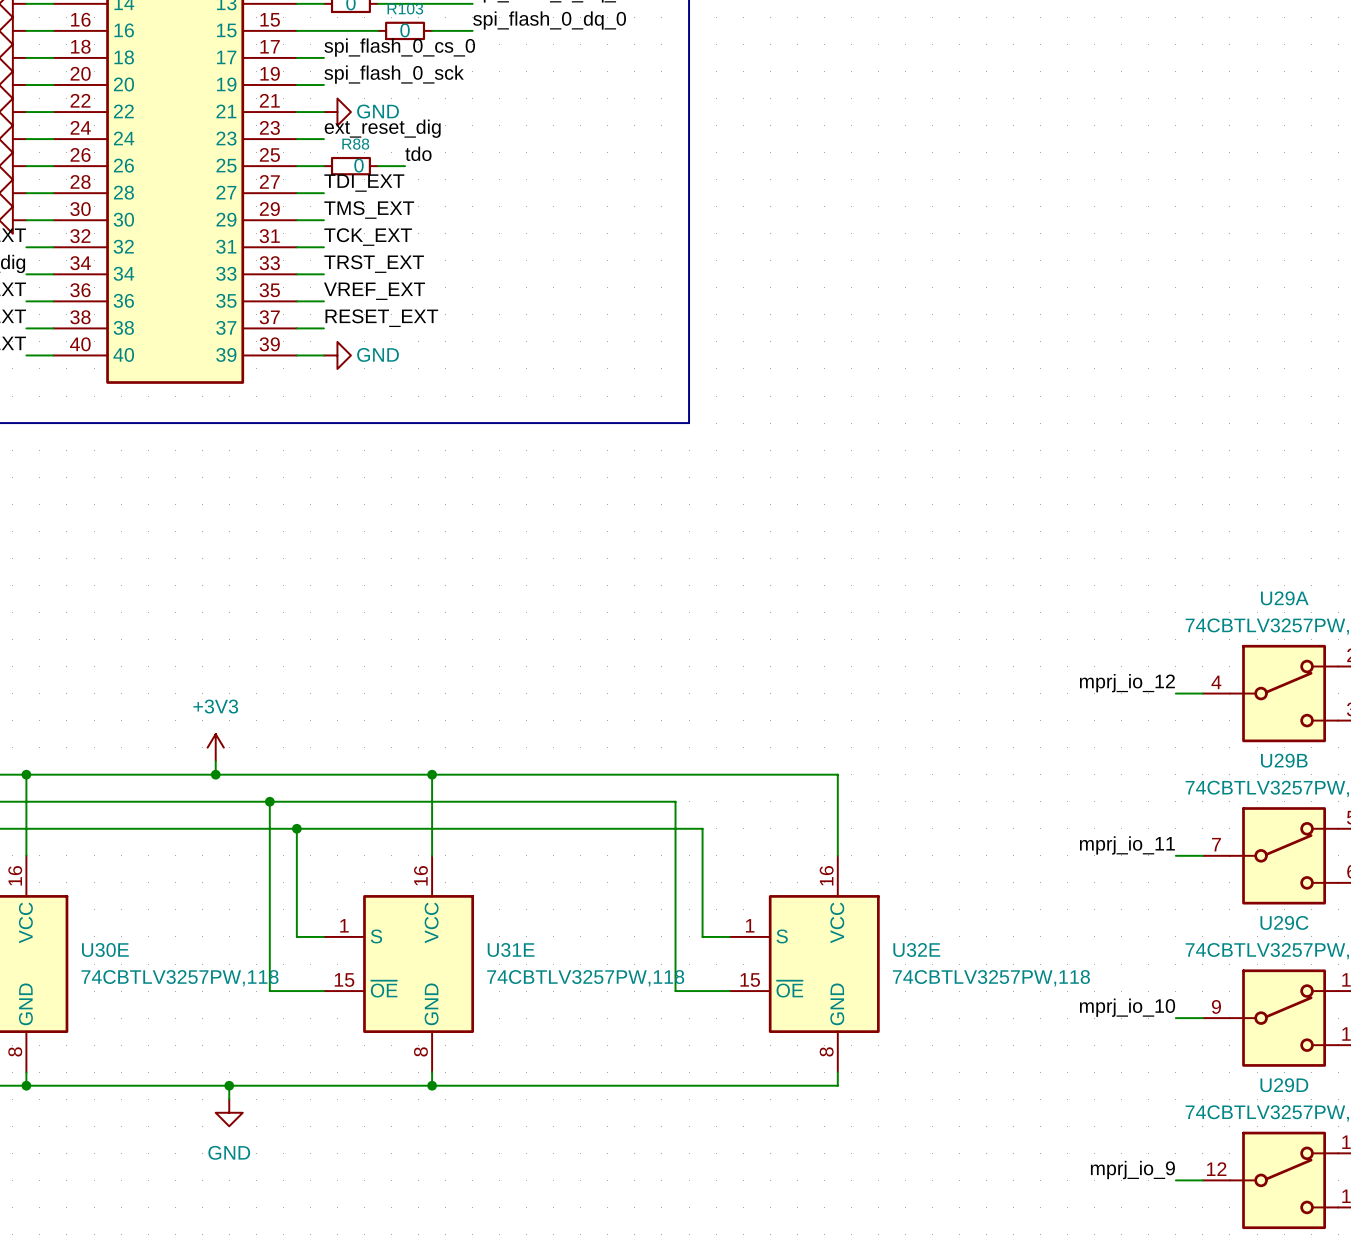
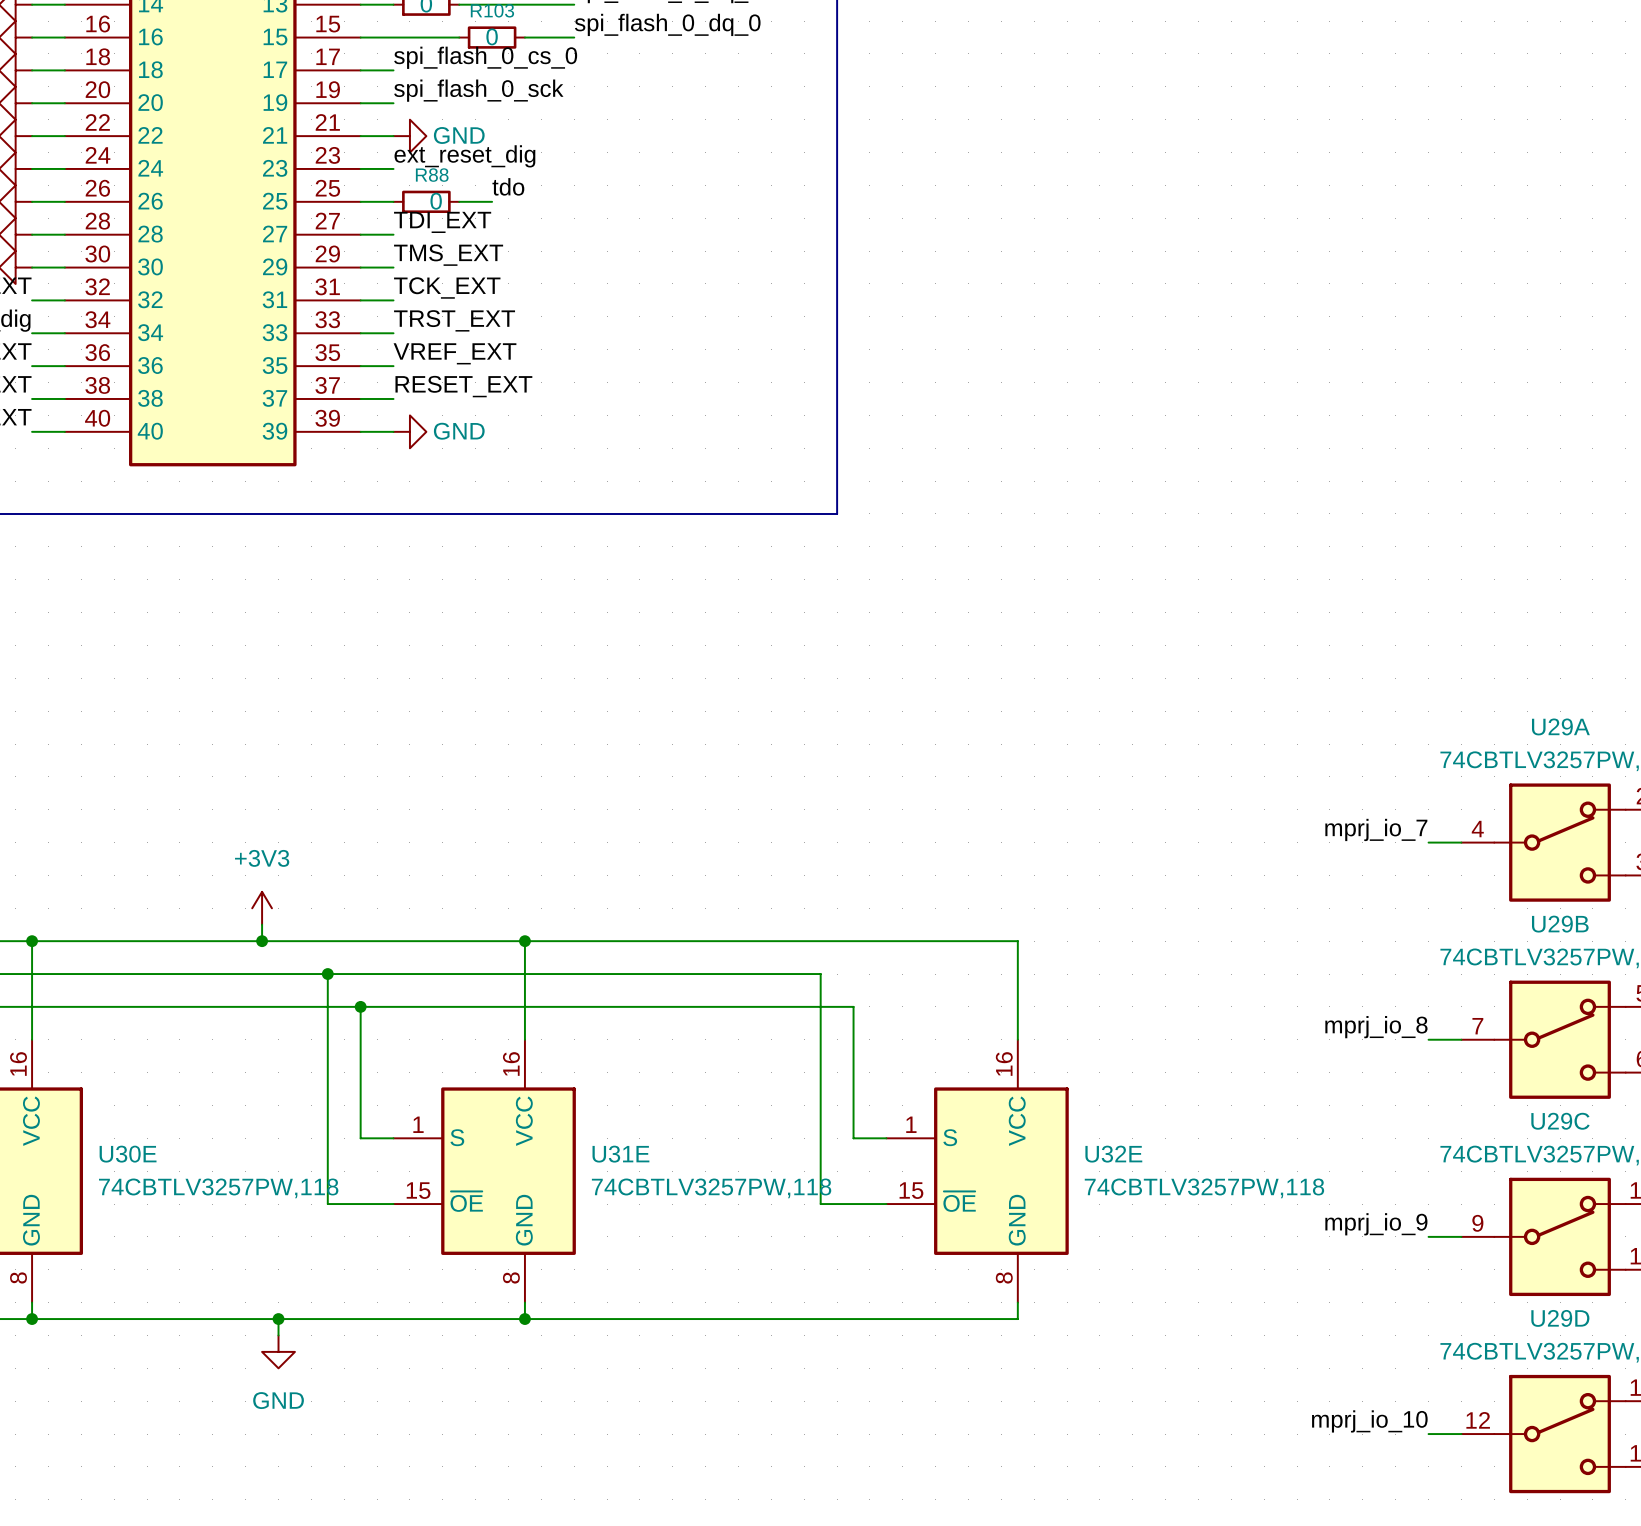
label: mprj_io_12 (1127, 683) -> mprj_io_7 (1376, 829)
label: mprj_io_11 (1127, 845) -> mprj_io_8 (1376, 1027)
label: mprj_io_10 (1127, 1007) -> mprj_io_9 (1376, 1224)
label: mprj_io_9 (1132, 1170) -> mprj_io_10 (1369, 1421)

